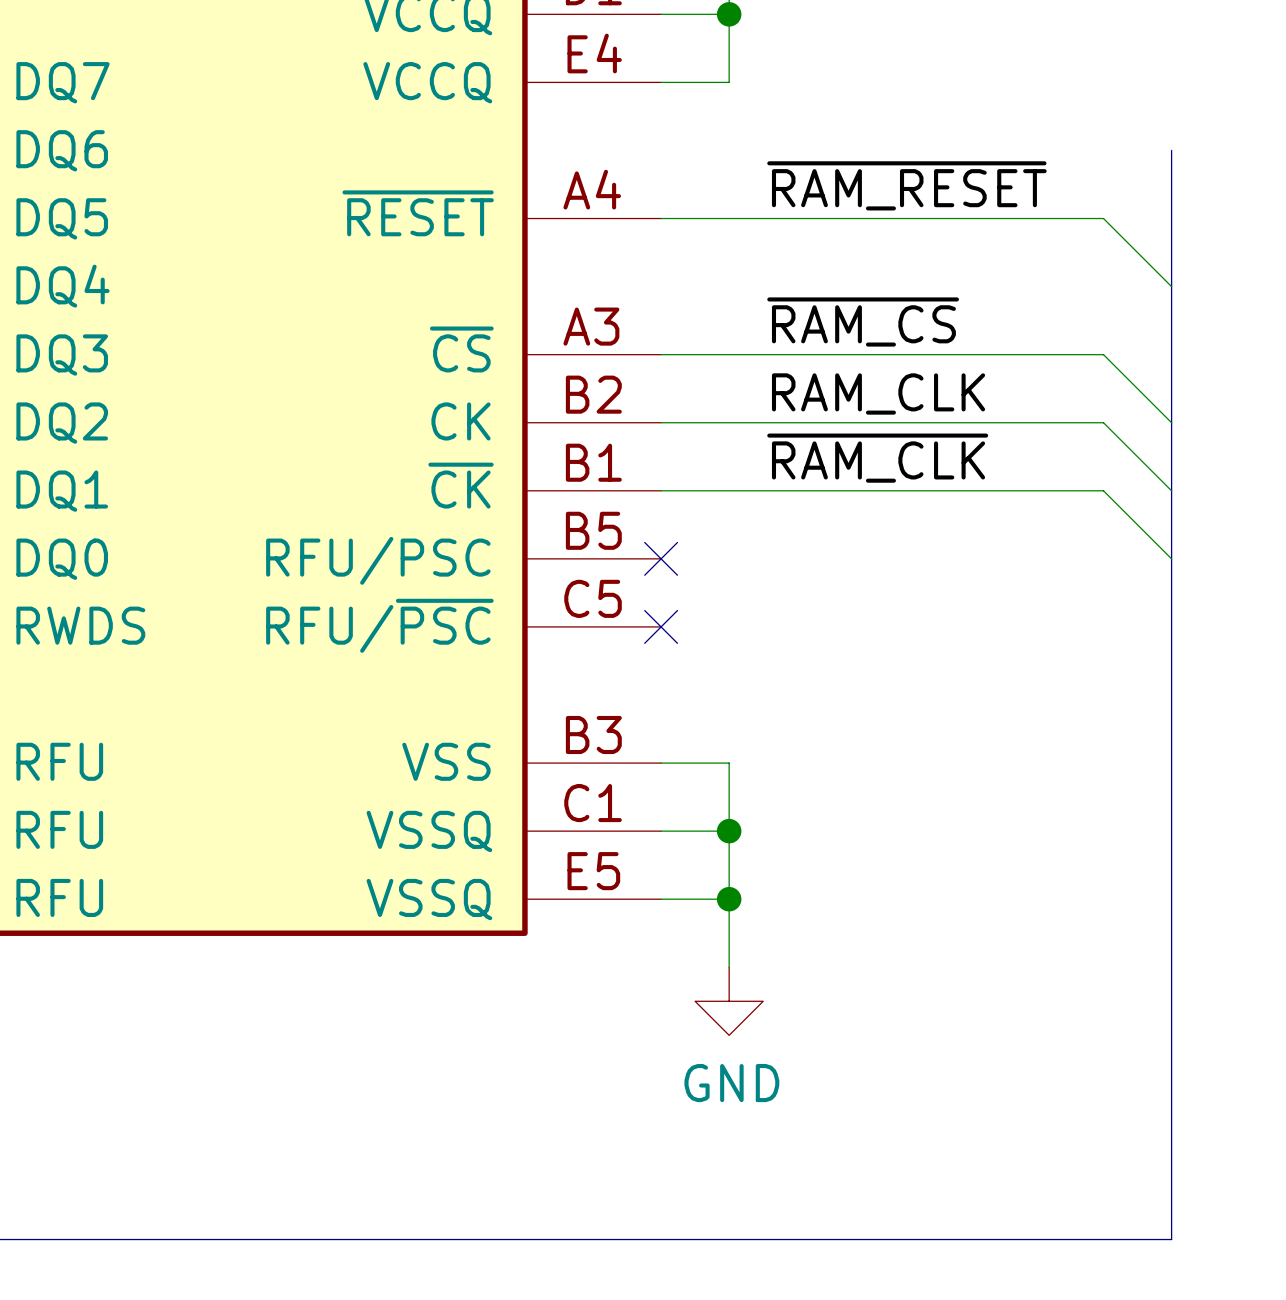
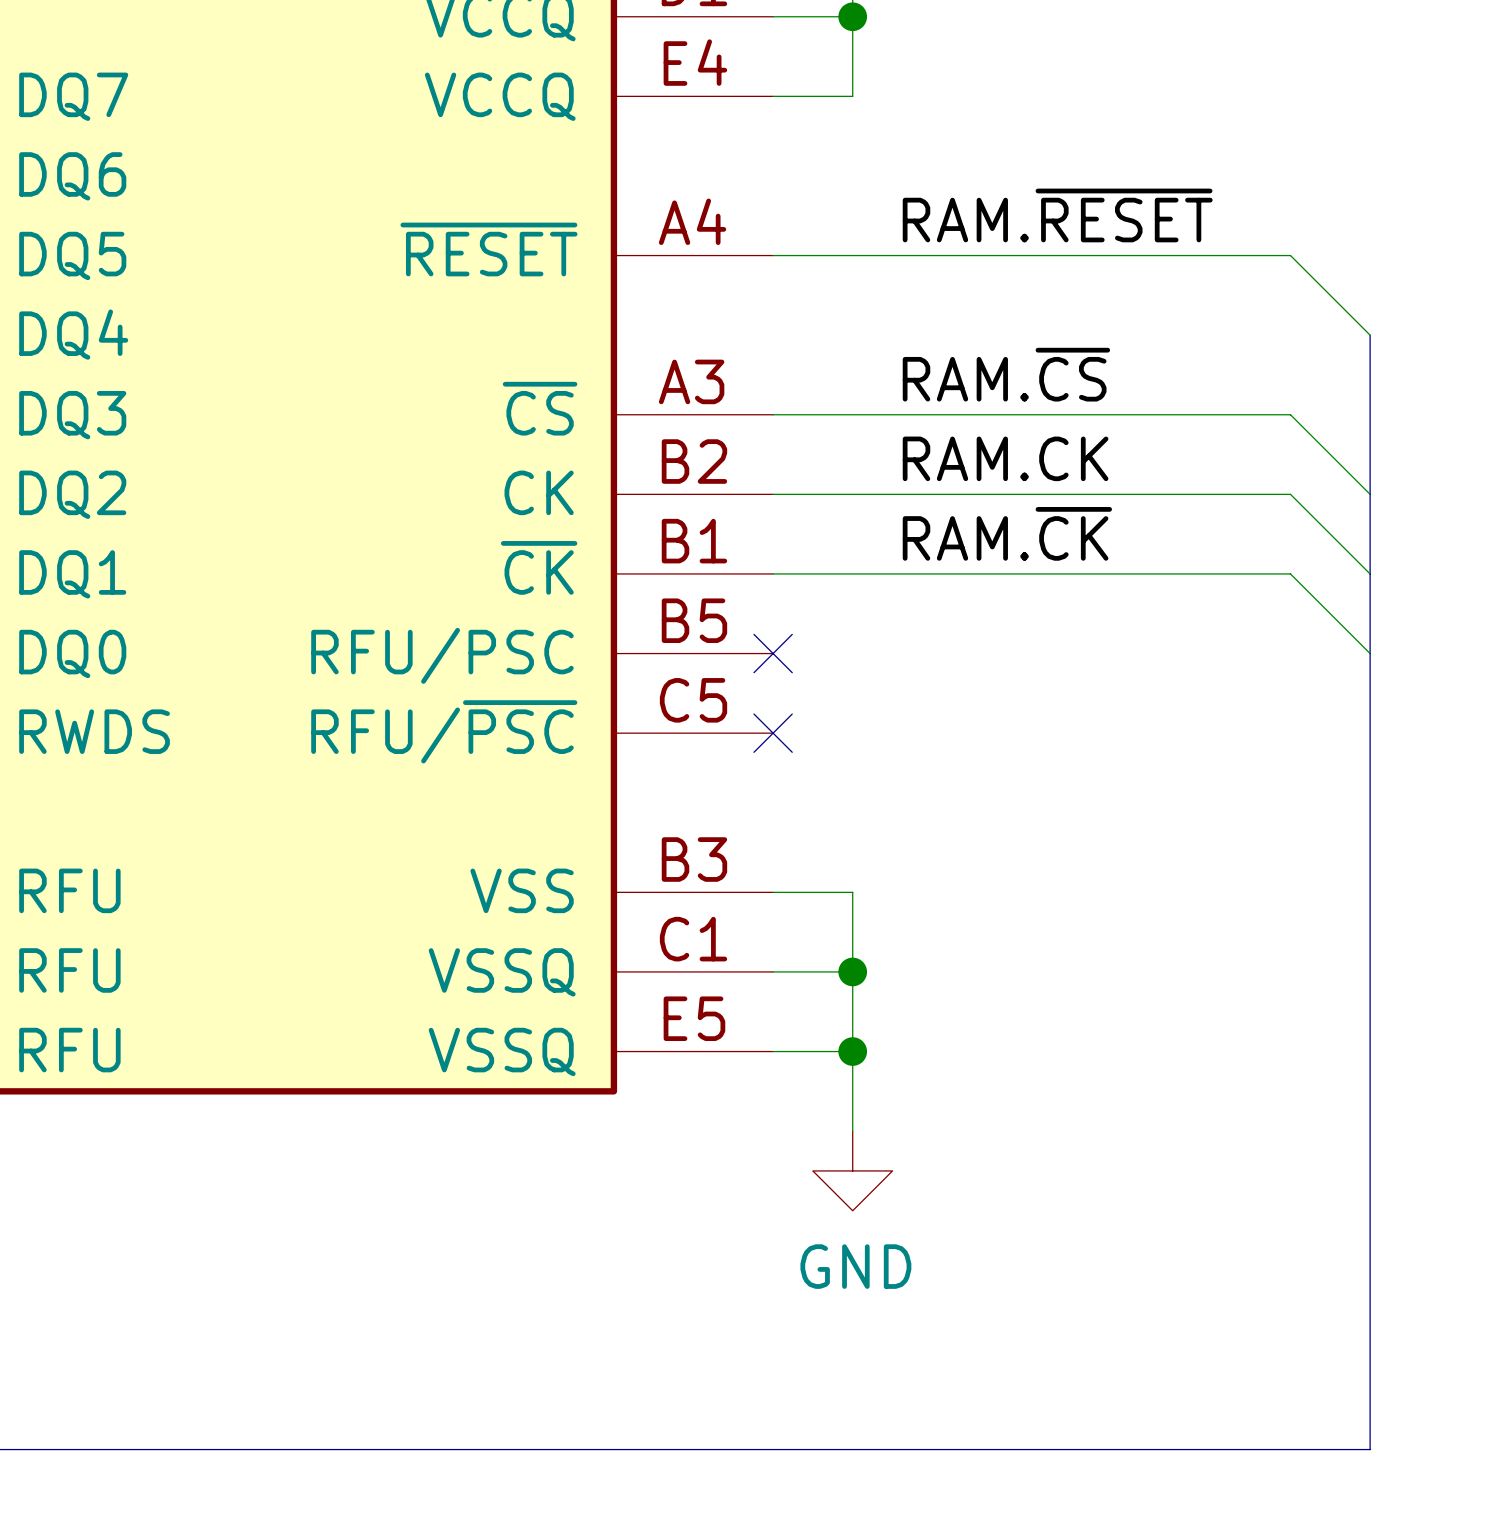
bus: (1171, 150) (1171, 286) -> none
label: ~{RAM_RESET} (906, 185) -> RAM.~{RESET} (1057, 215)
label: ~{RAM_CS} (863, 322) -> RAM.~{CS} (1006, 374)
label: RAM_CLK (878, 393) -> RAM.CK (1005, 458)
label: ~{RAM_CLK} (877, 458) -> RAM.~{CK} (1007, 533)

